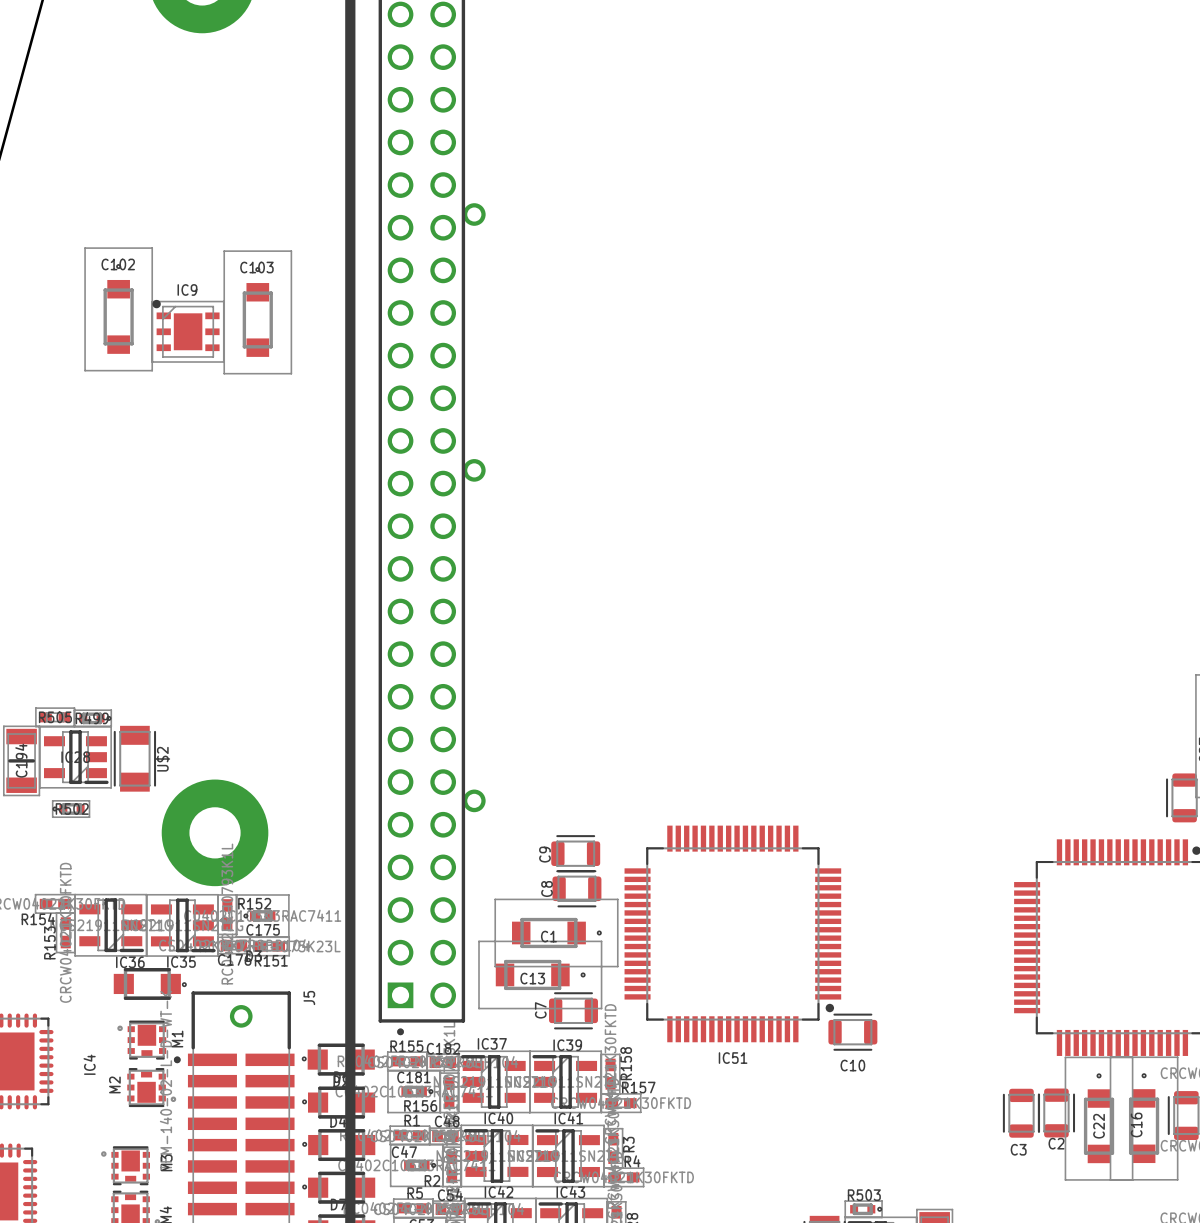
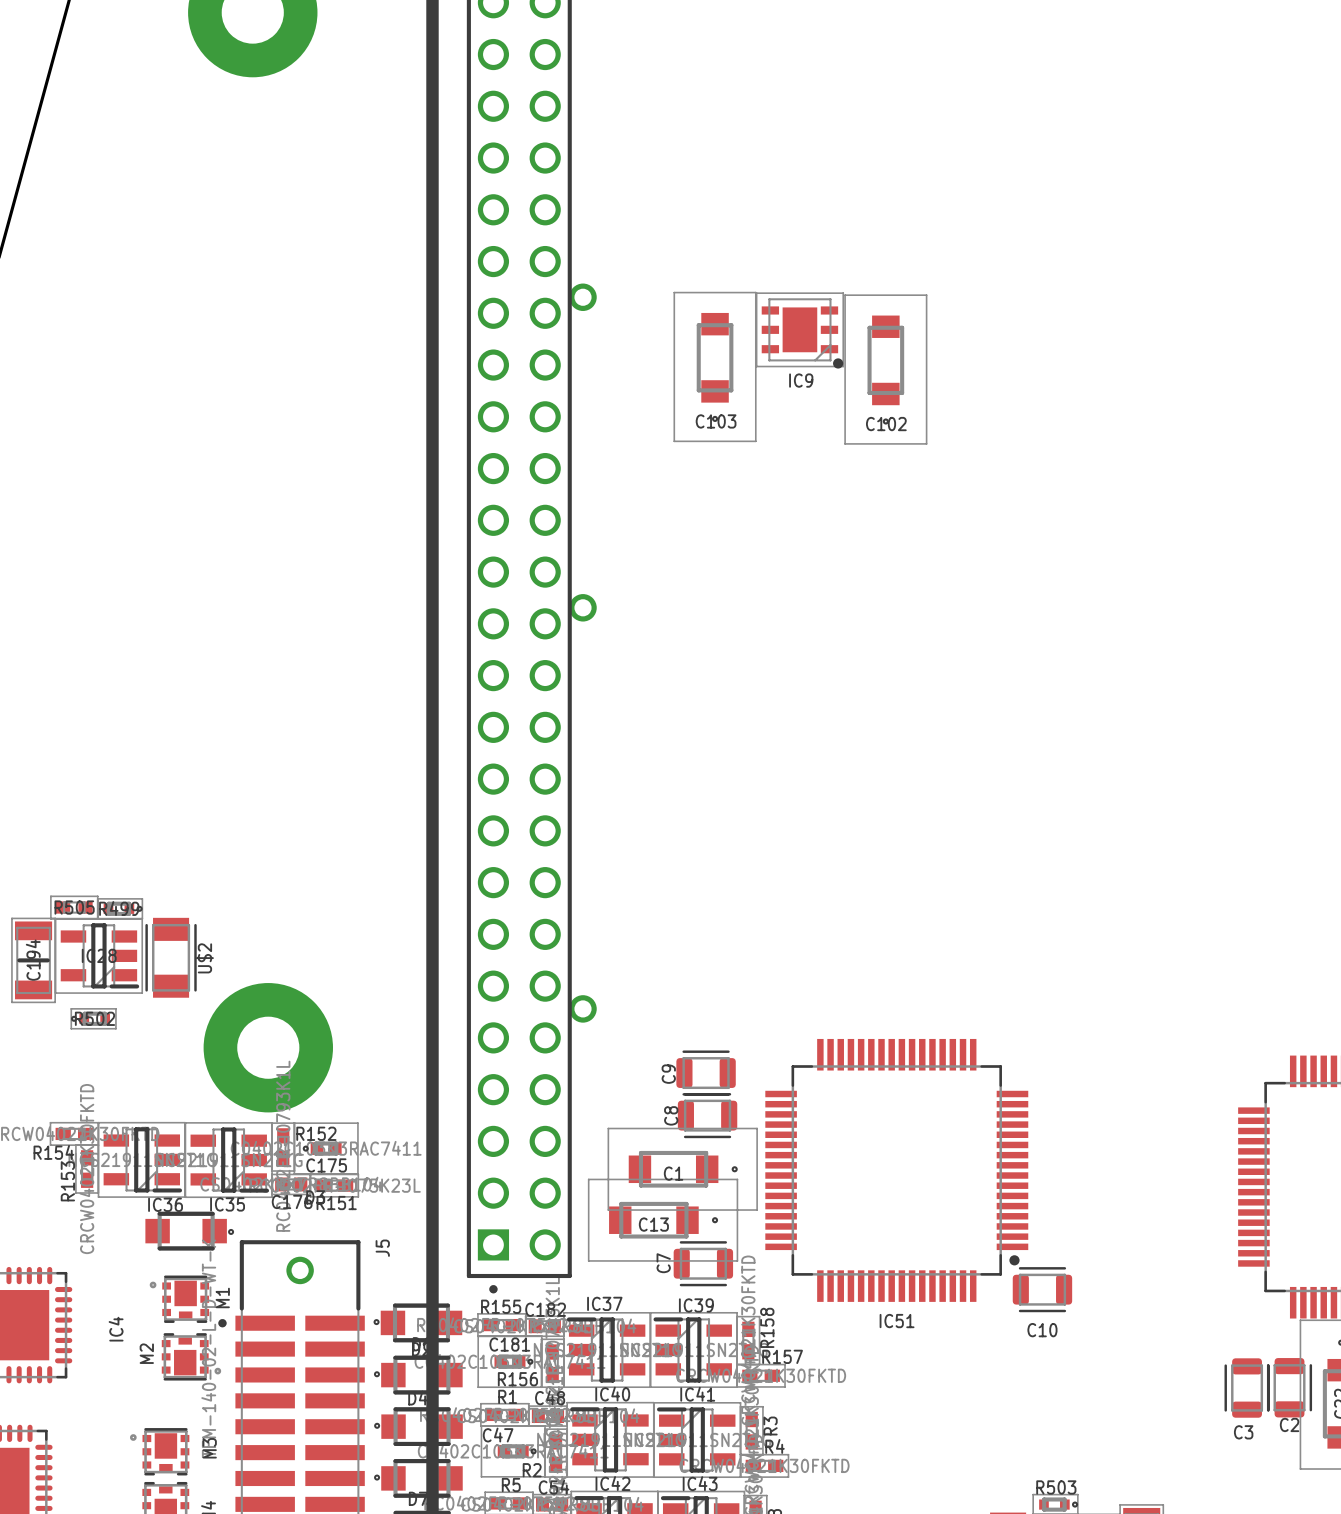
C102 rotation: 0° (118, 309) -> 180° (885, 369)
C102 position: (118, 309) -> (885, 369)
C103 rotation: 0° (257, 312) -> 180° (715, 366)
C103 position: (257, 312) -> (715, 366)
IC9 rotation: 0° (188, 331) -> 180° (799, 330)
IC9 position: (188, 331) -> (799, 330)

